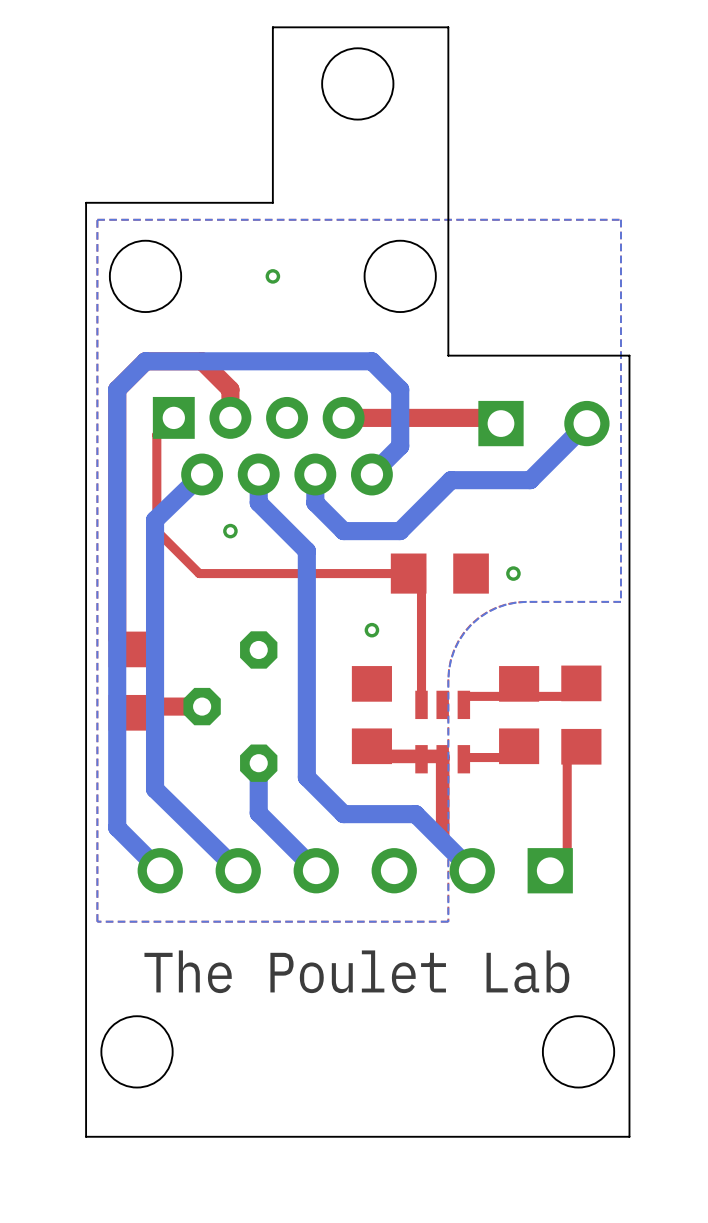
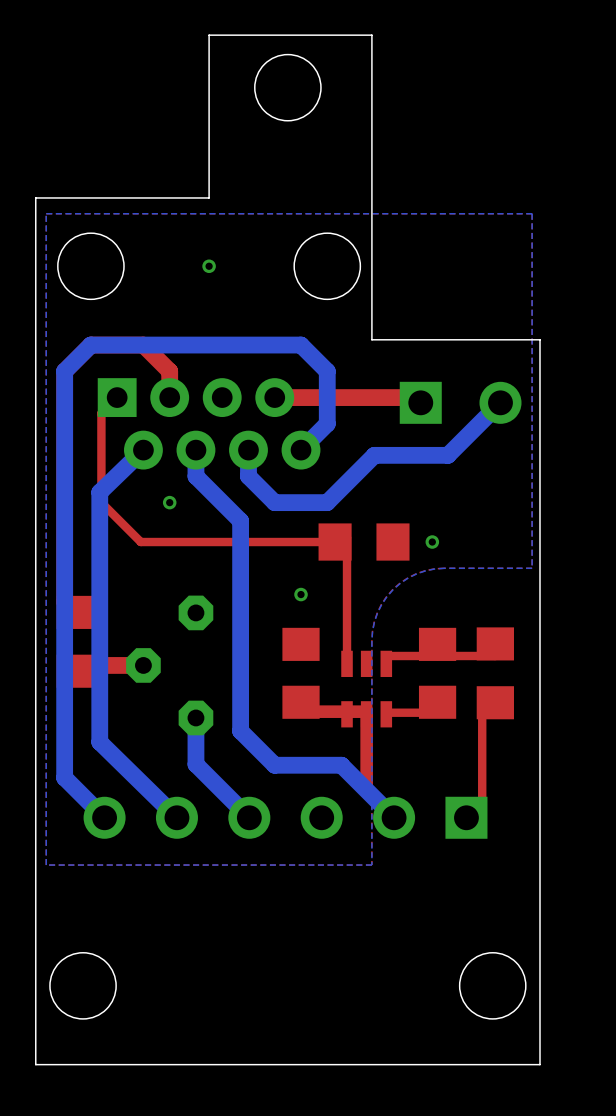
text: The Poulet Lab (356, 971) -> none

